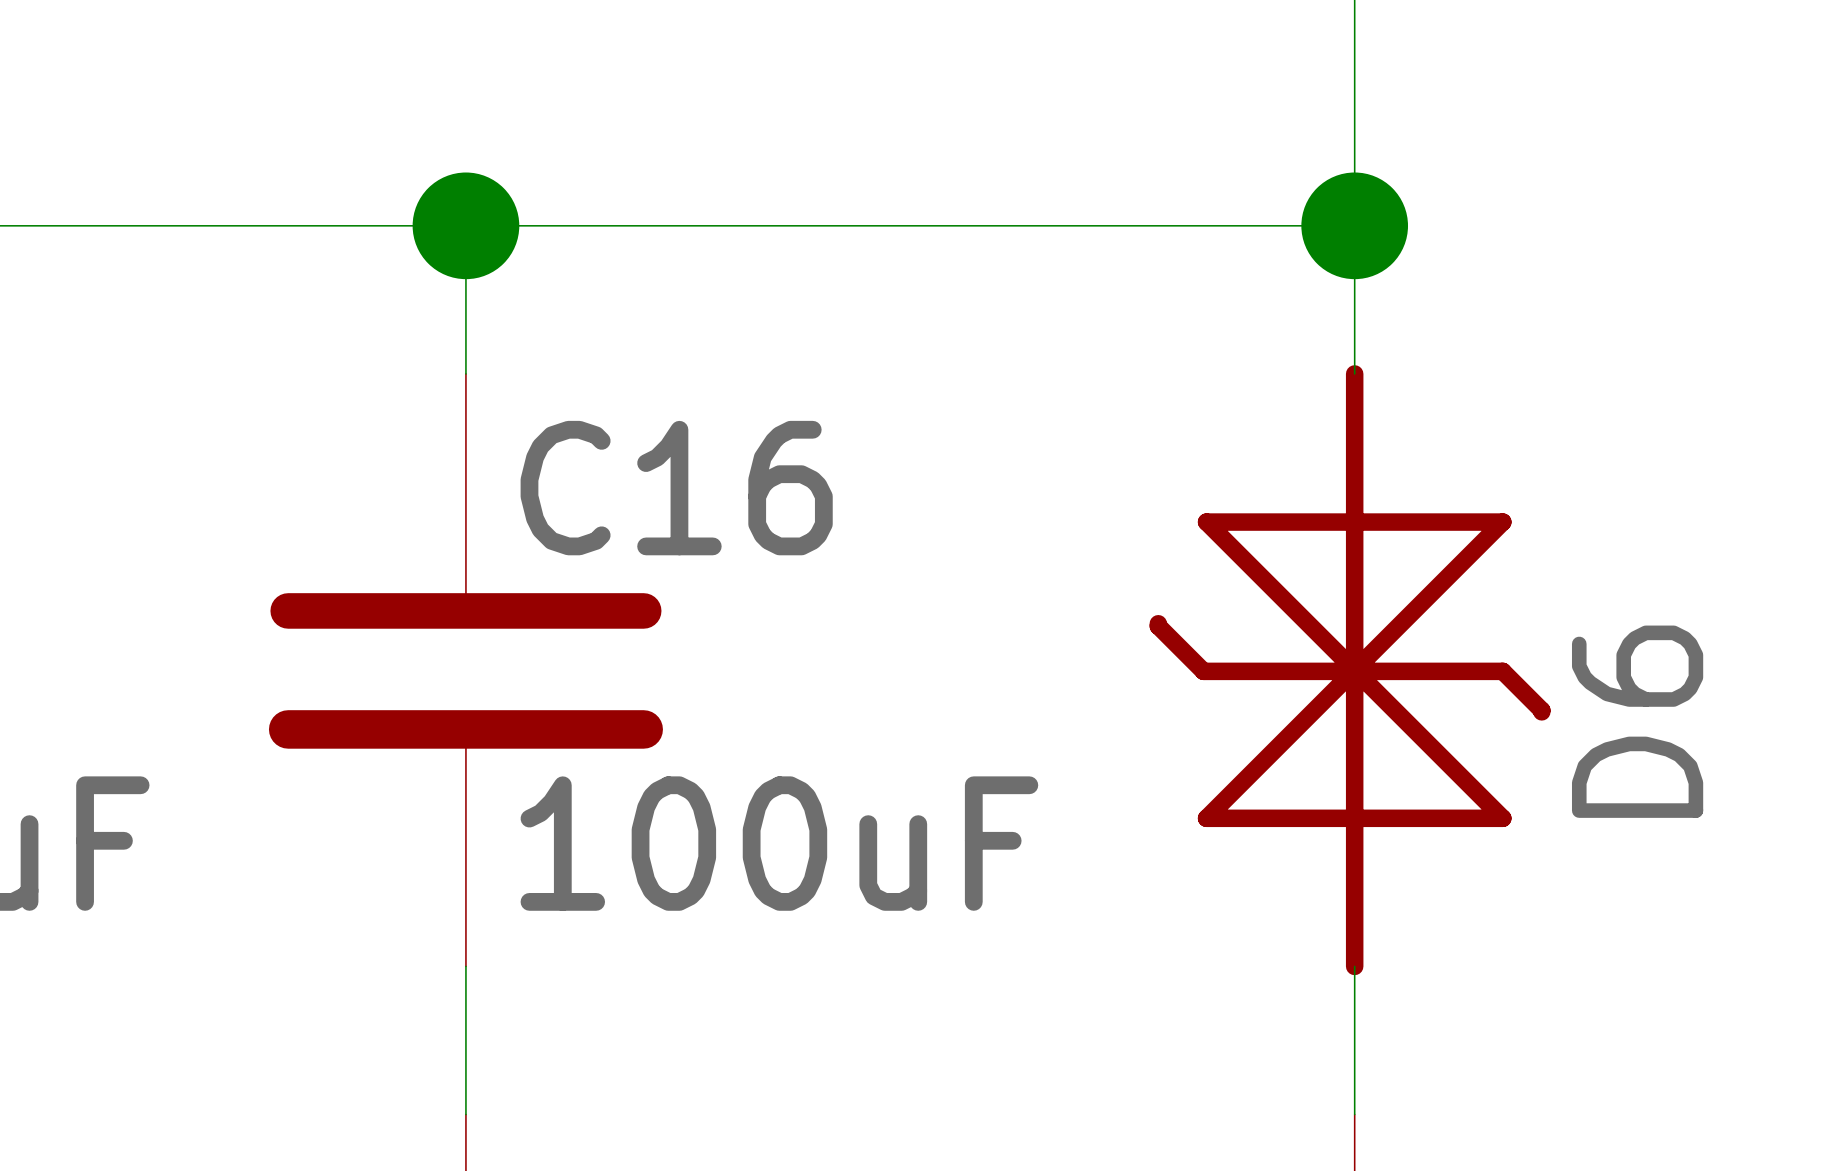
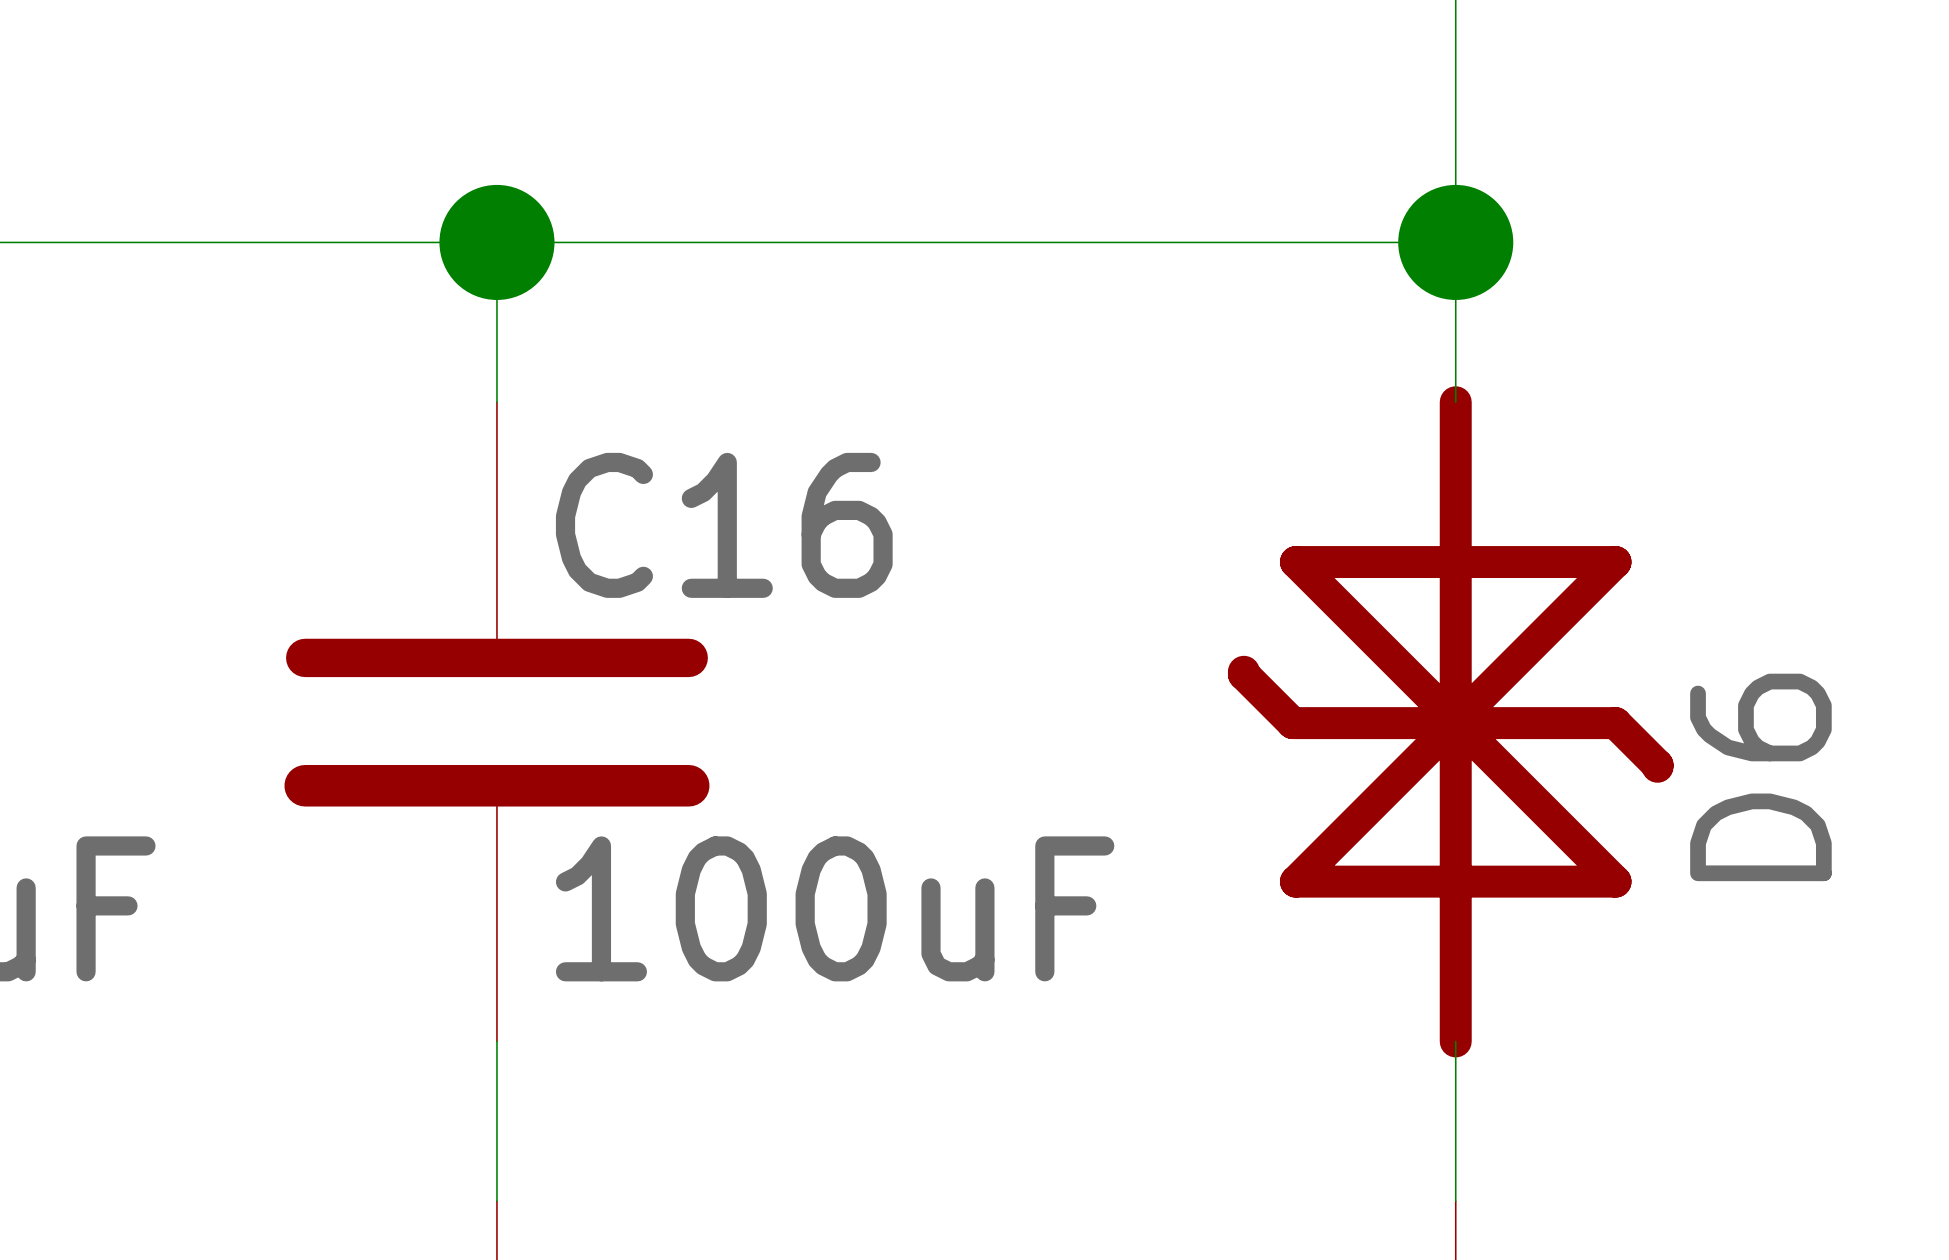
D6 symbol: [1149, 365, 1551, 976] -> [1227, 386, 1674, 1058]

